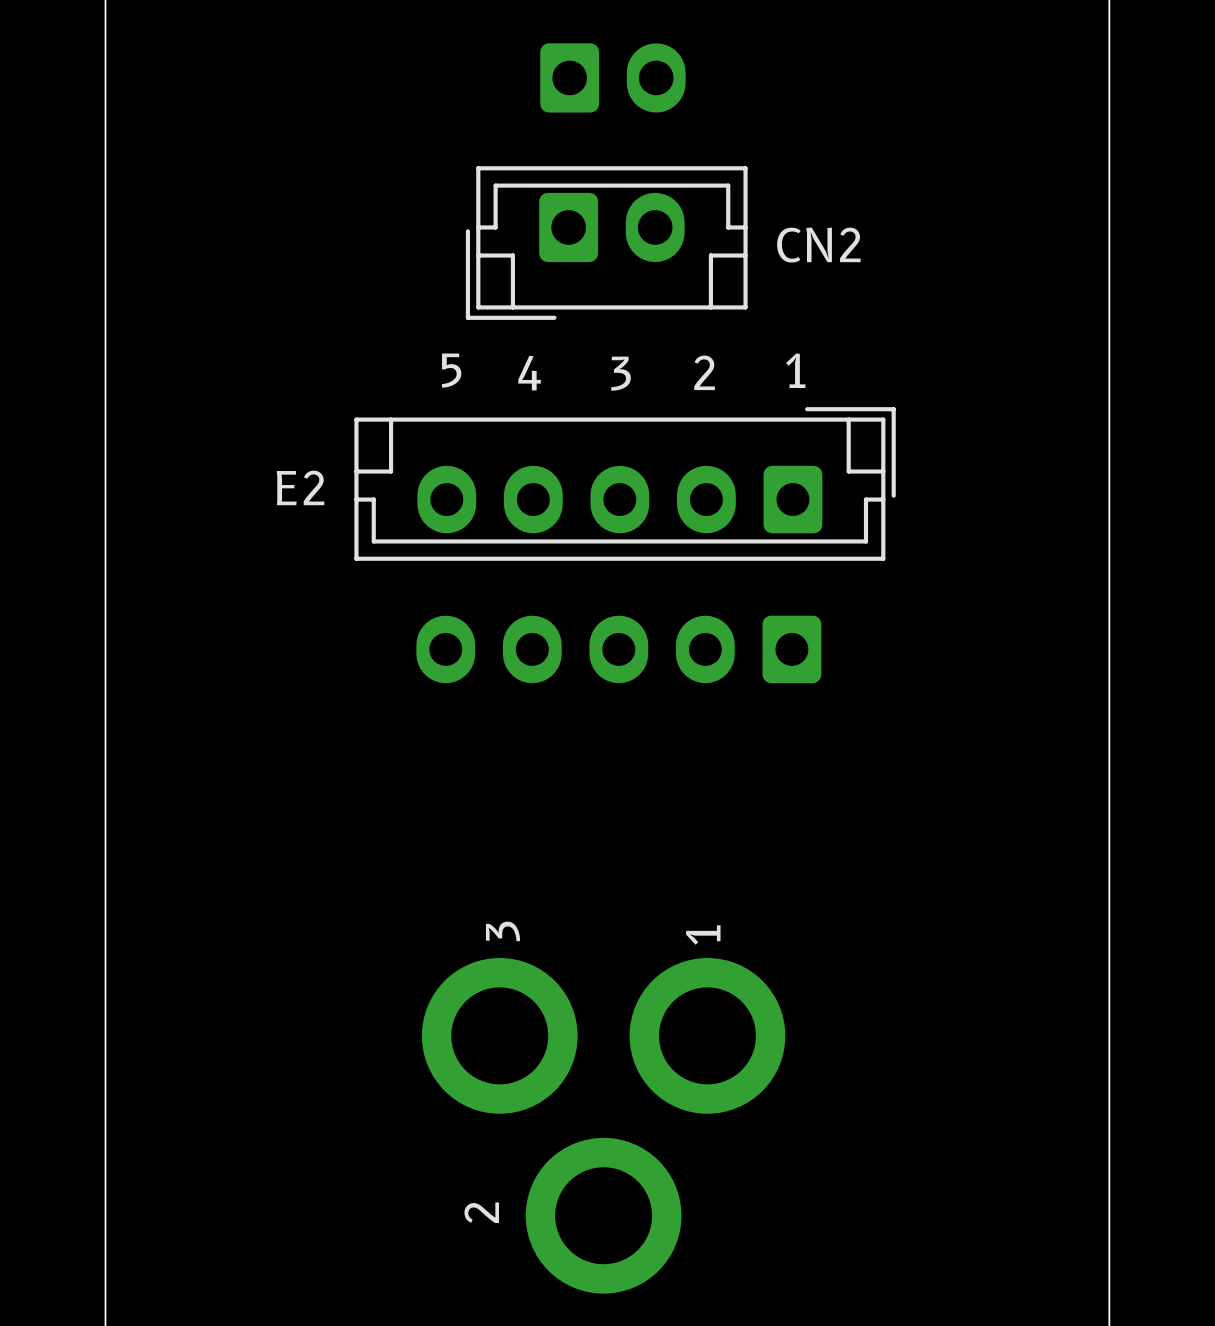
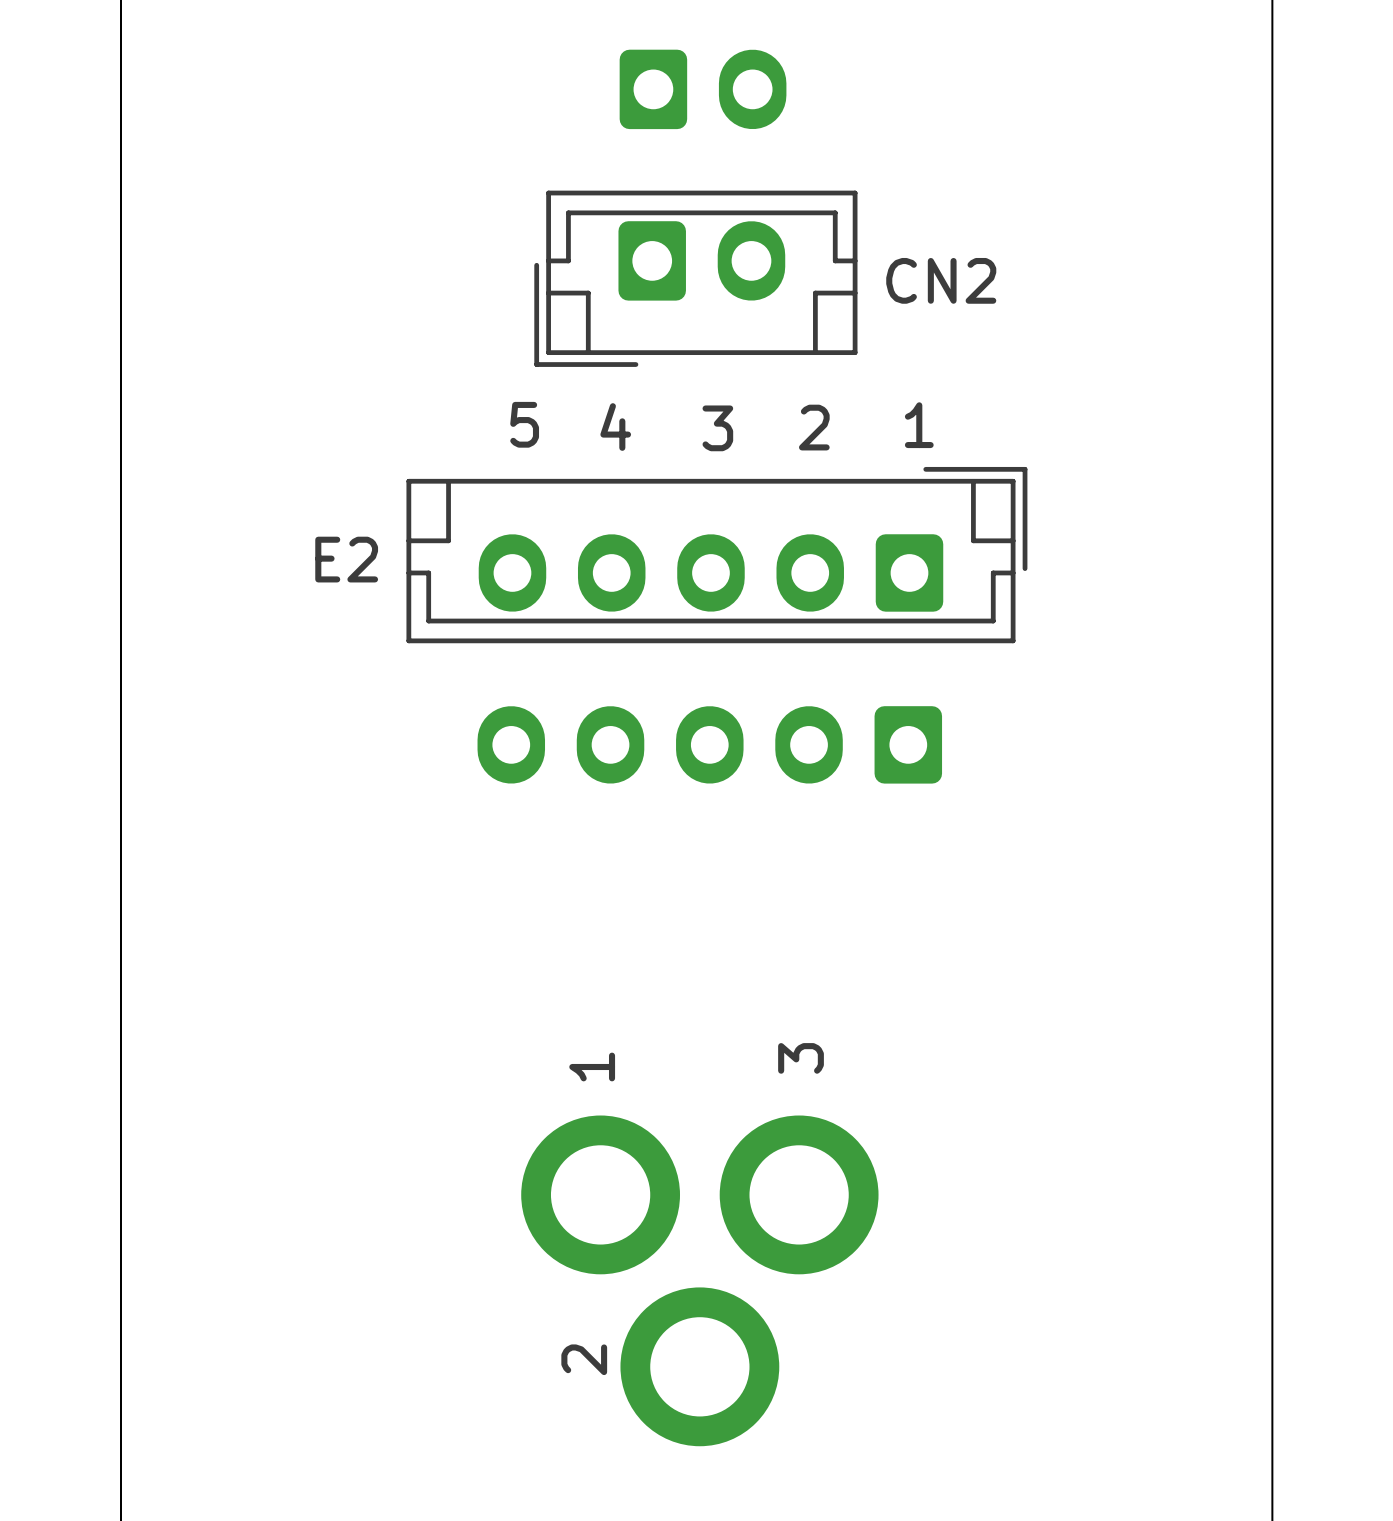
text: 3 (503, 931) -> 1 (592, 1066)
text: 1 (703, 935) -> 3 (801, 1058)
part footprint: [421, 957, 786, 1294] -> [521, 1115, 879, 1447]
text position: 2 (481, 1212) -> 2 (584, 1359)

